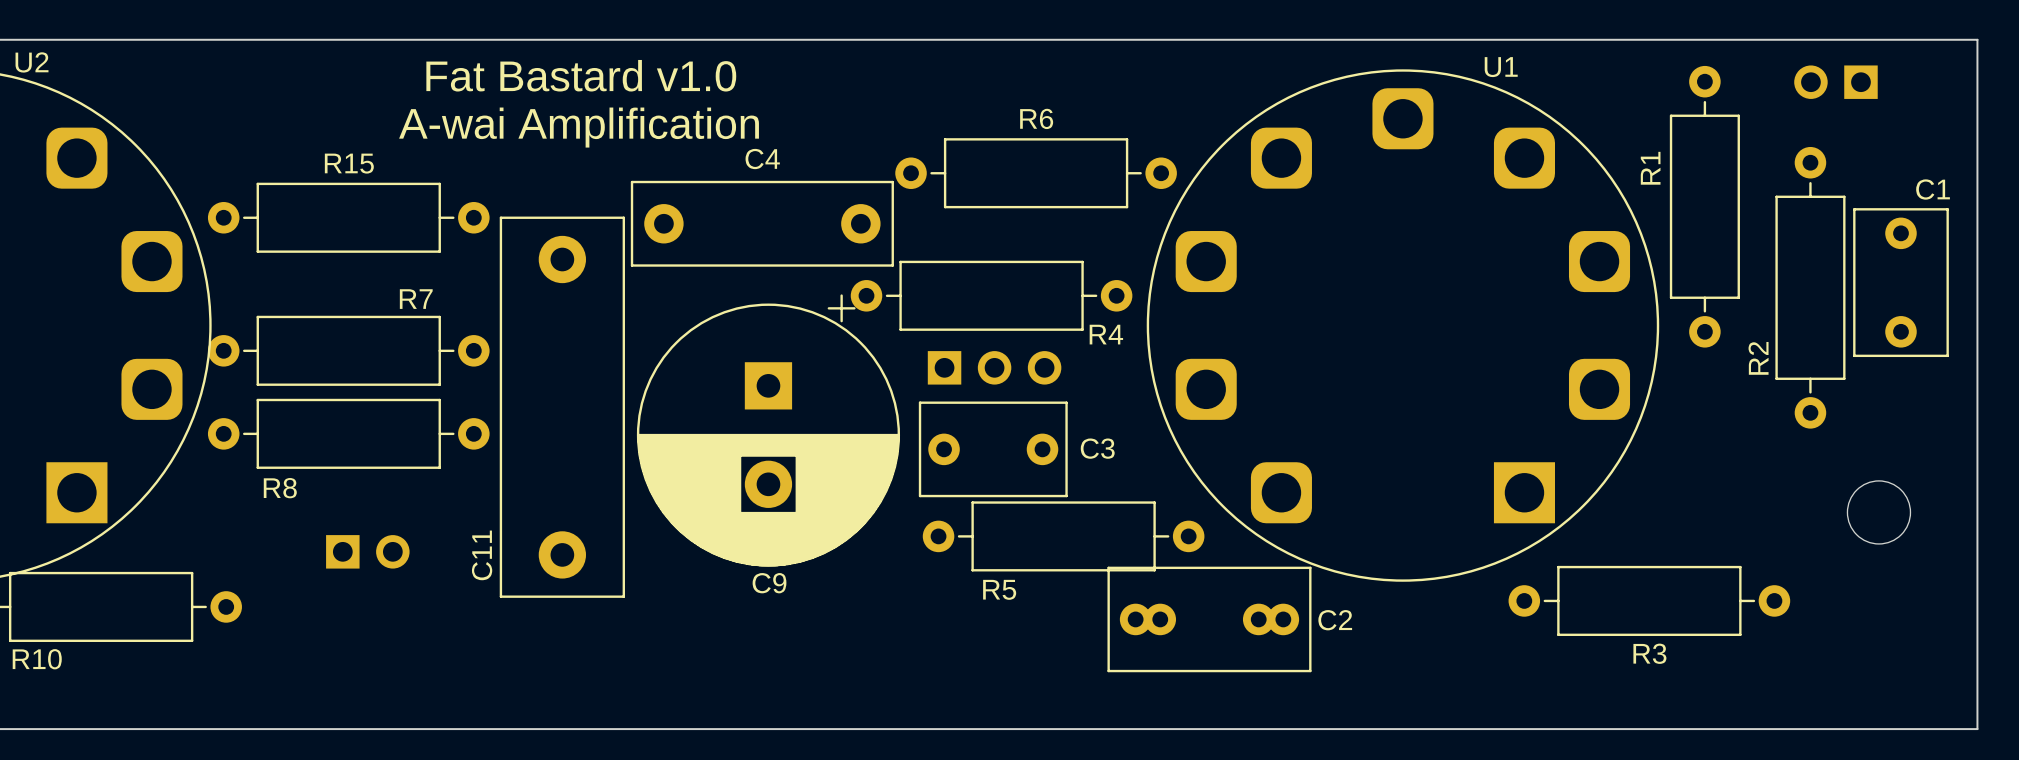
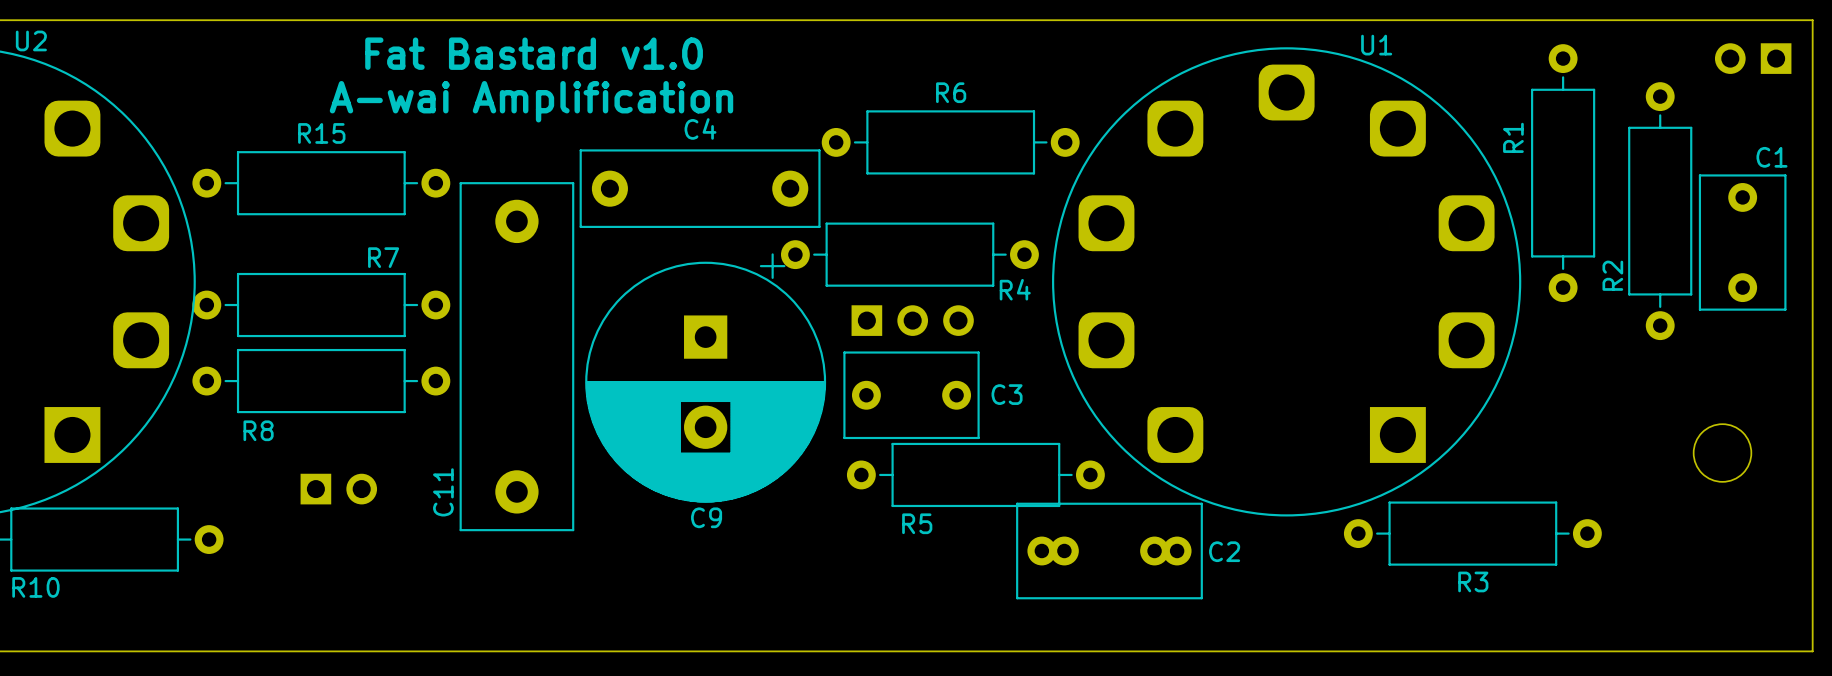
part position: (1835, 82) -> (1753, 58)
R2 position: (1810, 287) -> (1660, 211)
R3 position: (1649, 600) -> (1472, 533)

